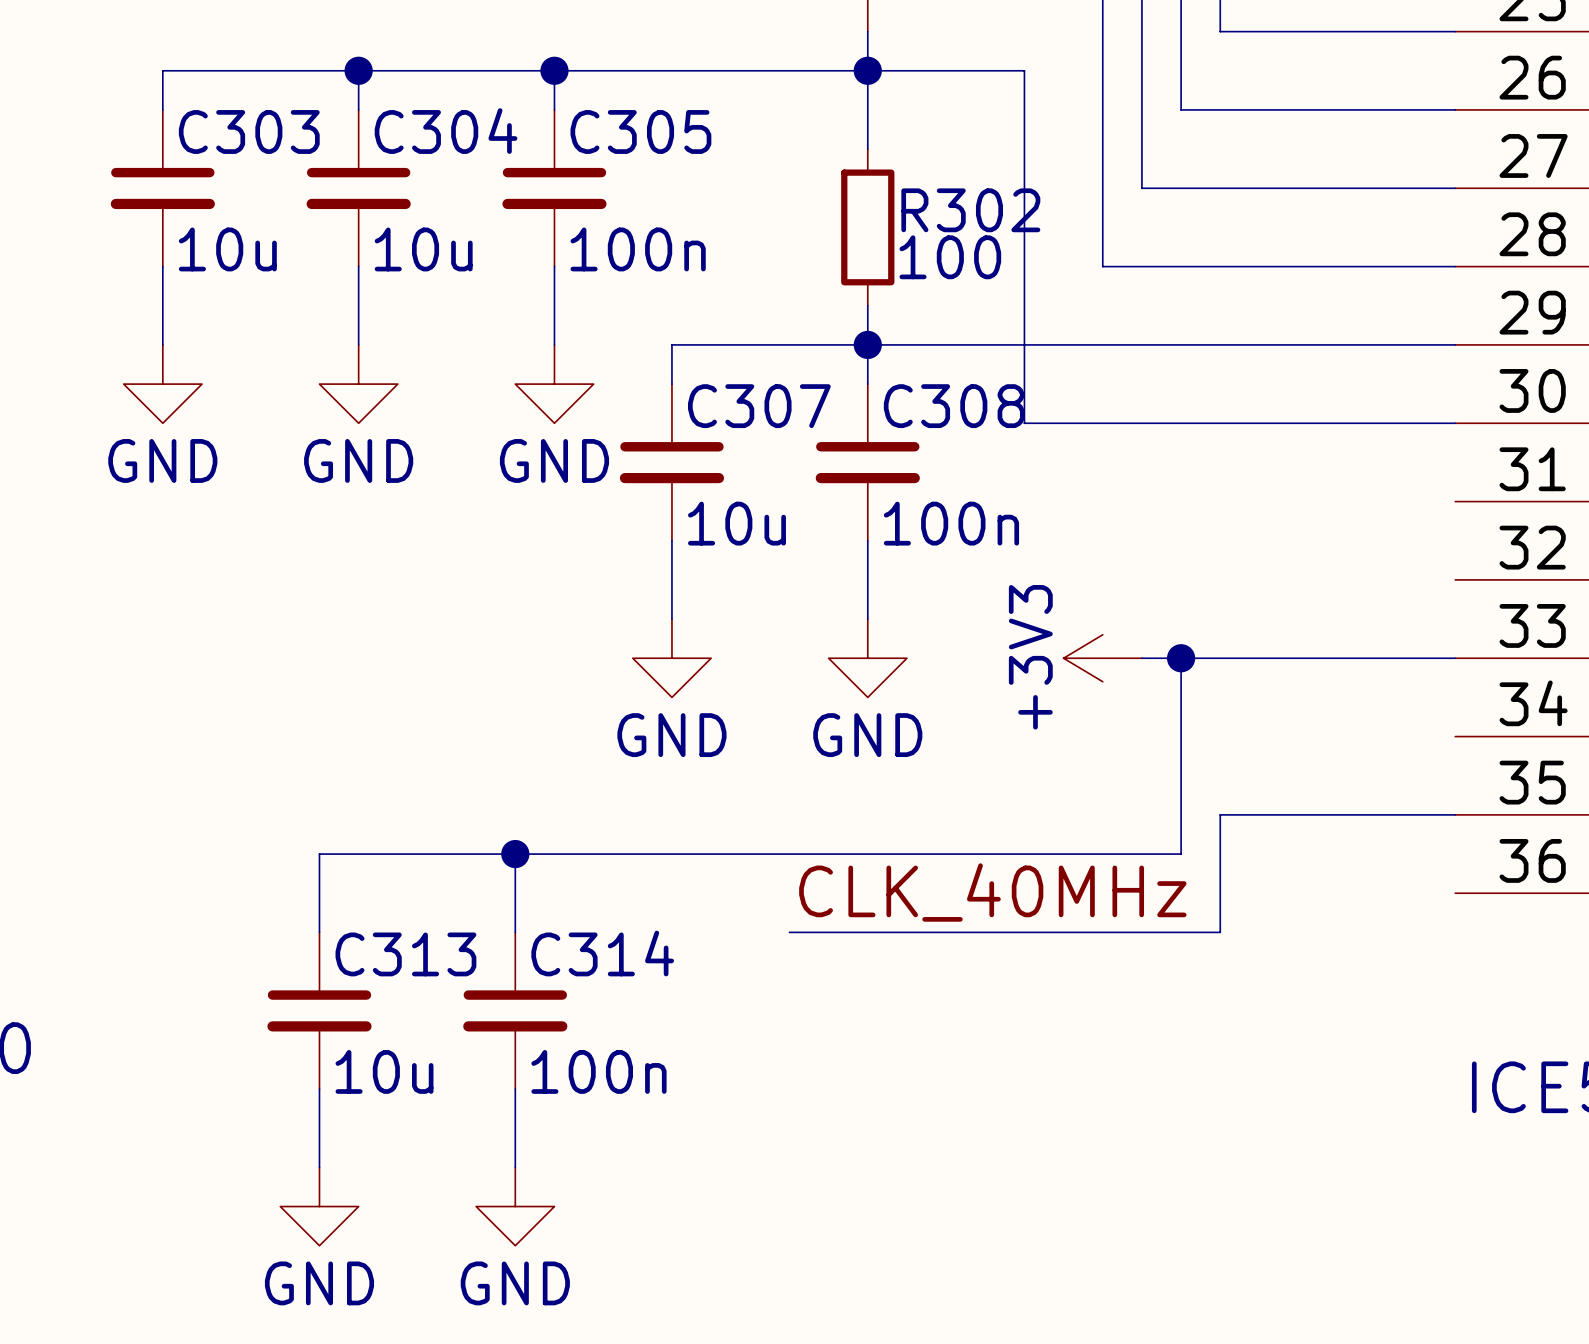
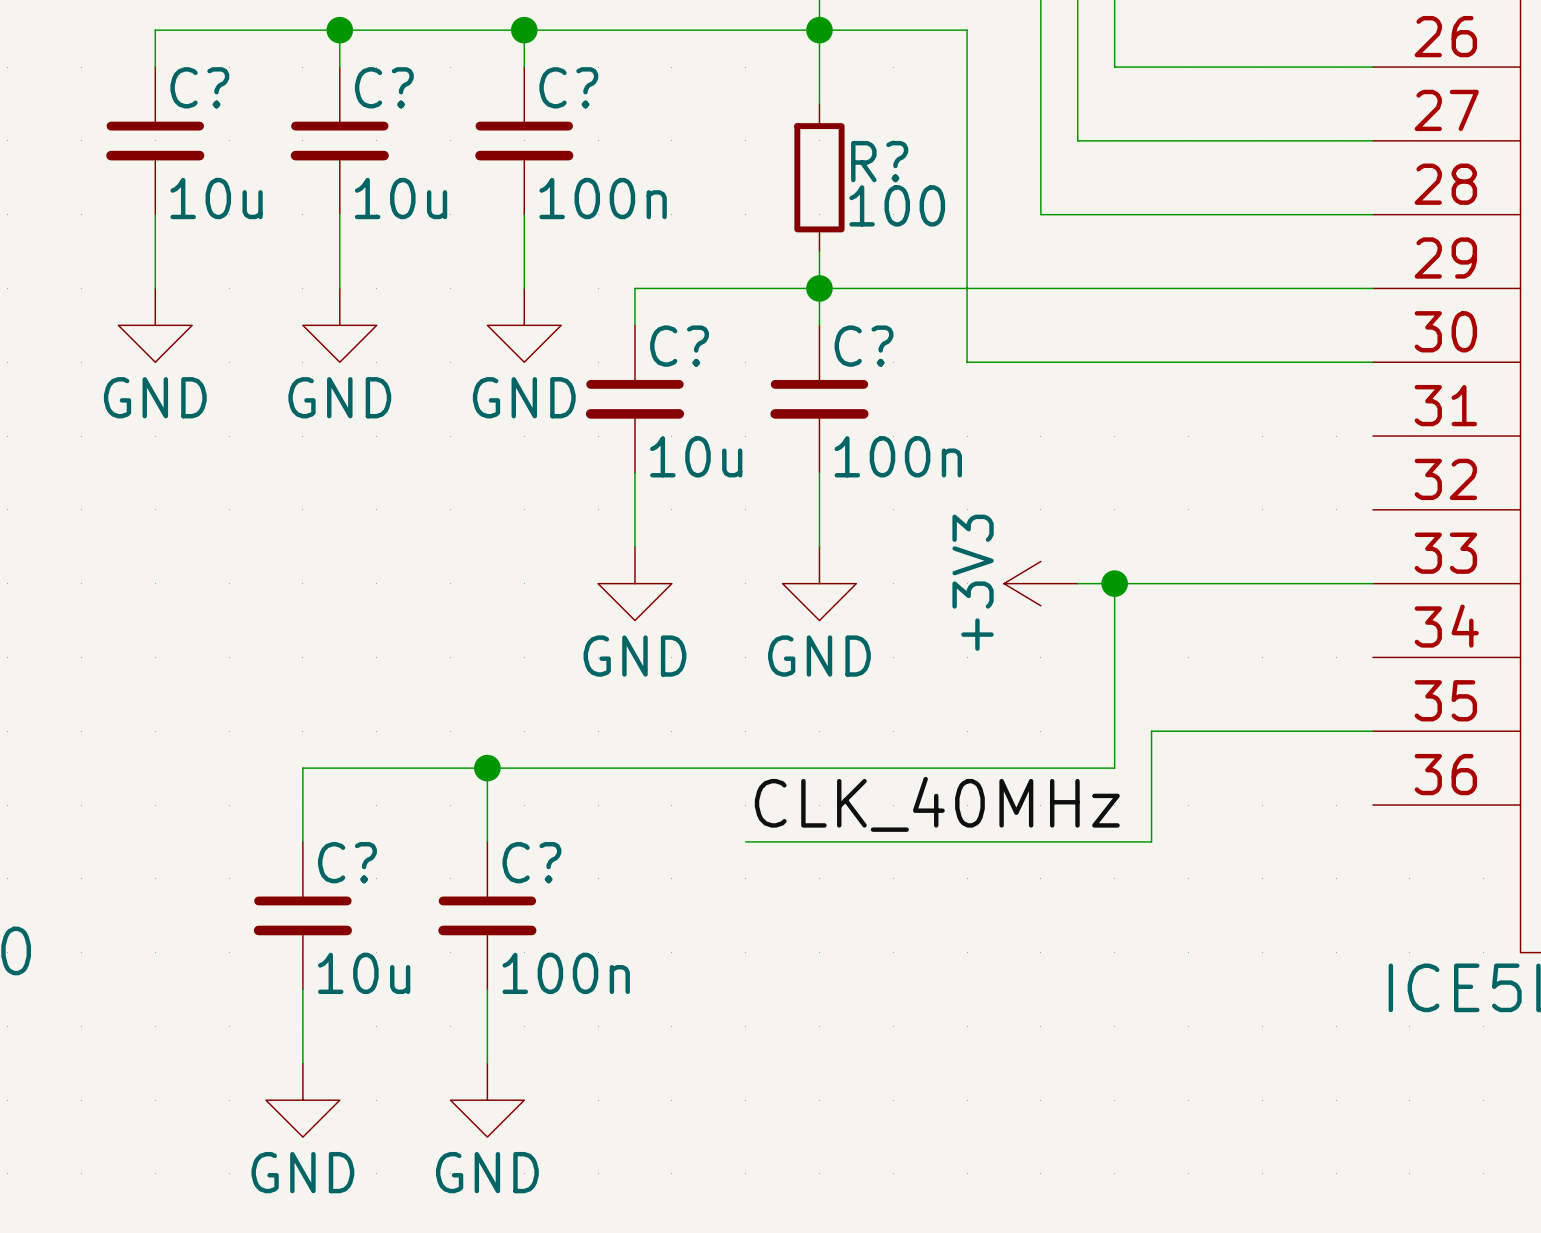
C303 name: C303 (249, 131) -> C? (199, 87)
C304 name: C304 (446, 131) -> C? (384, 87)
C305 name: C305 (640, 131) -> C? (568, 87)
R302 name: R302 (970, 210) -> R? (879, 161)
C307 name: C307 (759, 406) -> C? (679, 346)
C308 name: C308 (954, 406) -> C? (864, 346)
C314 name: C314 (602, 953) -> C? (531, 862)
C313 name: C313 (405, 954) -> C? (347, 862)

